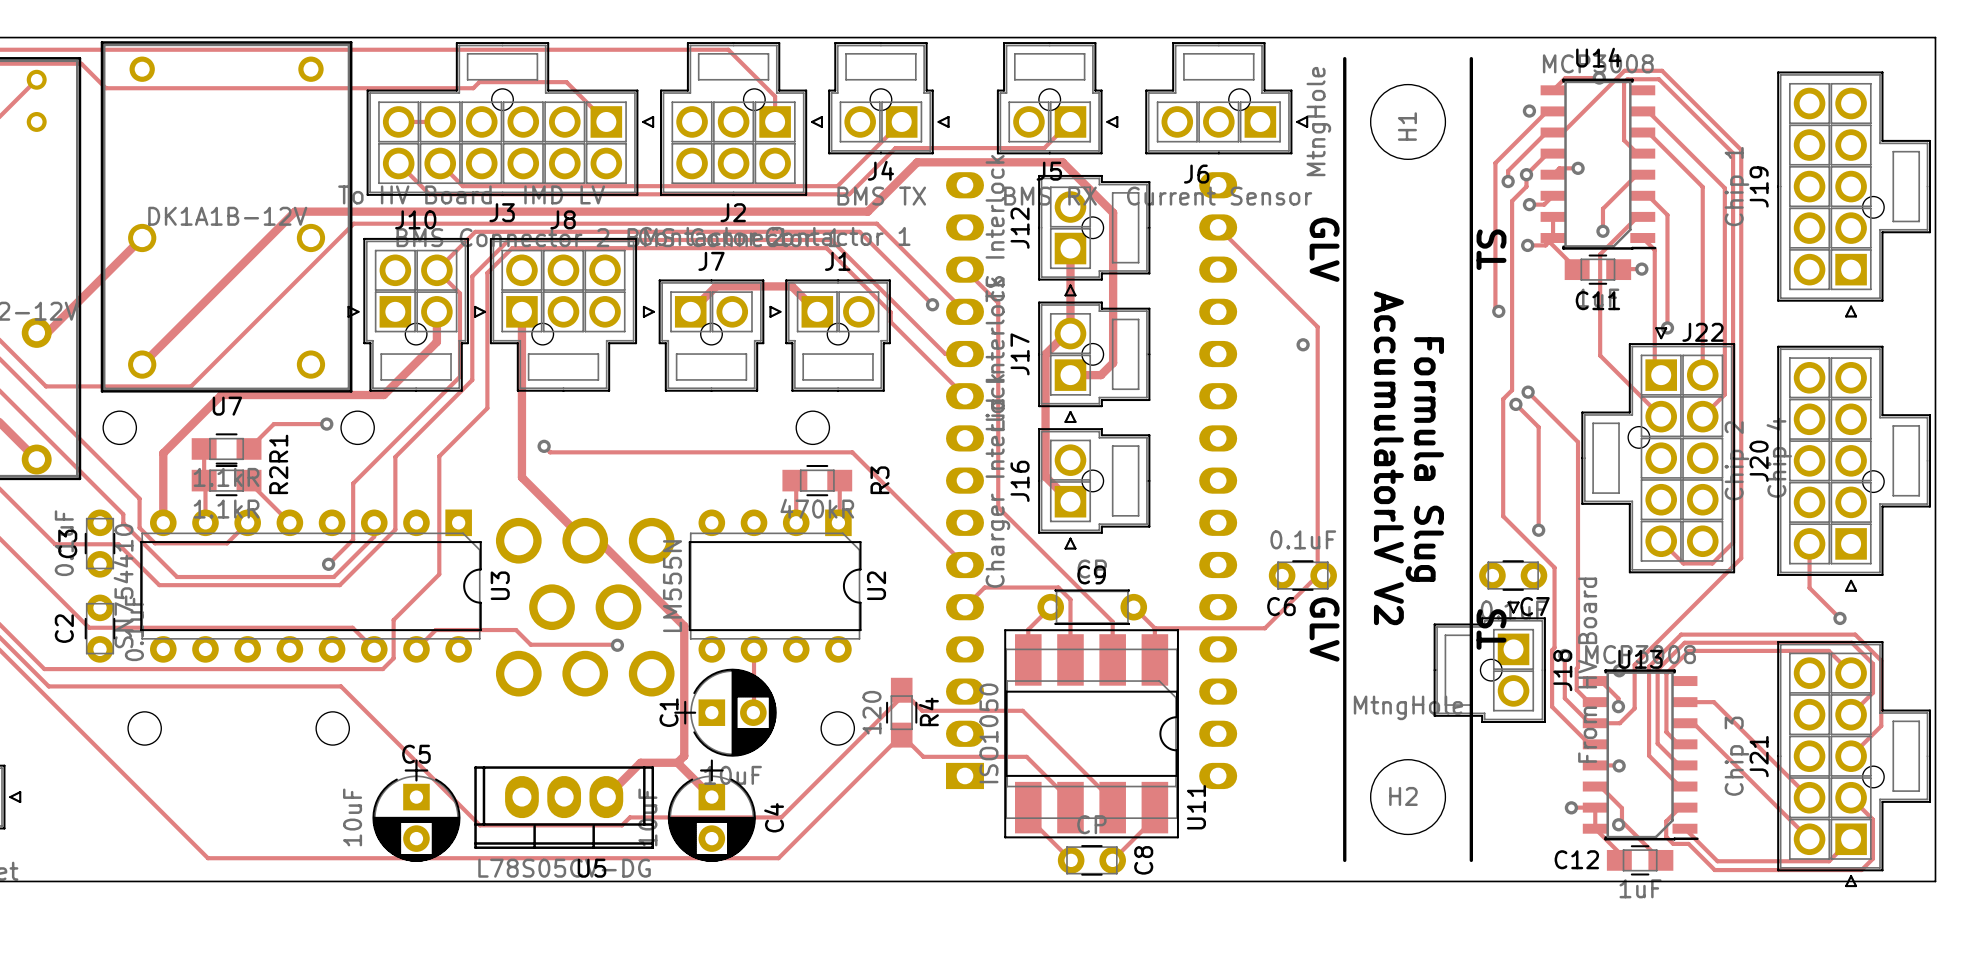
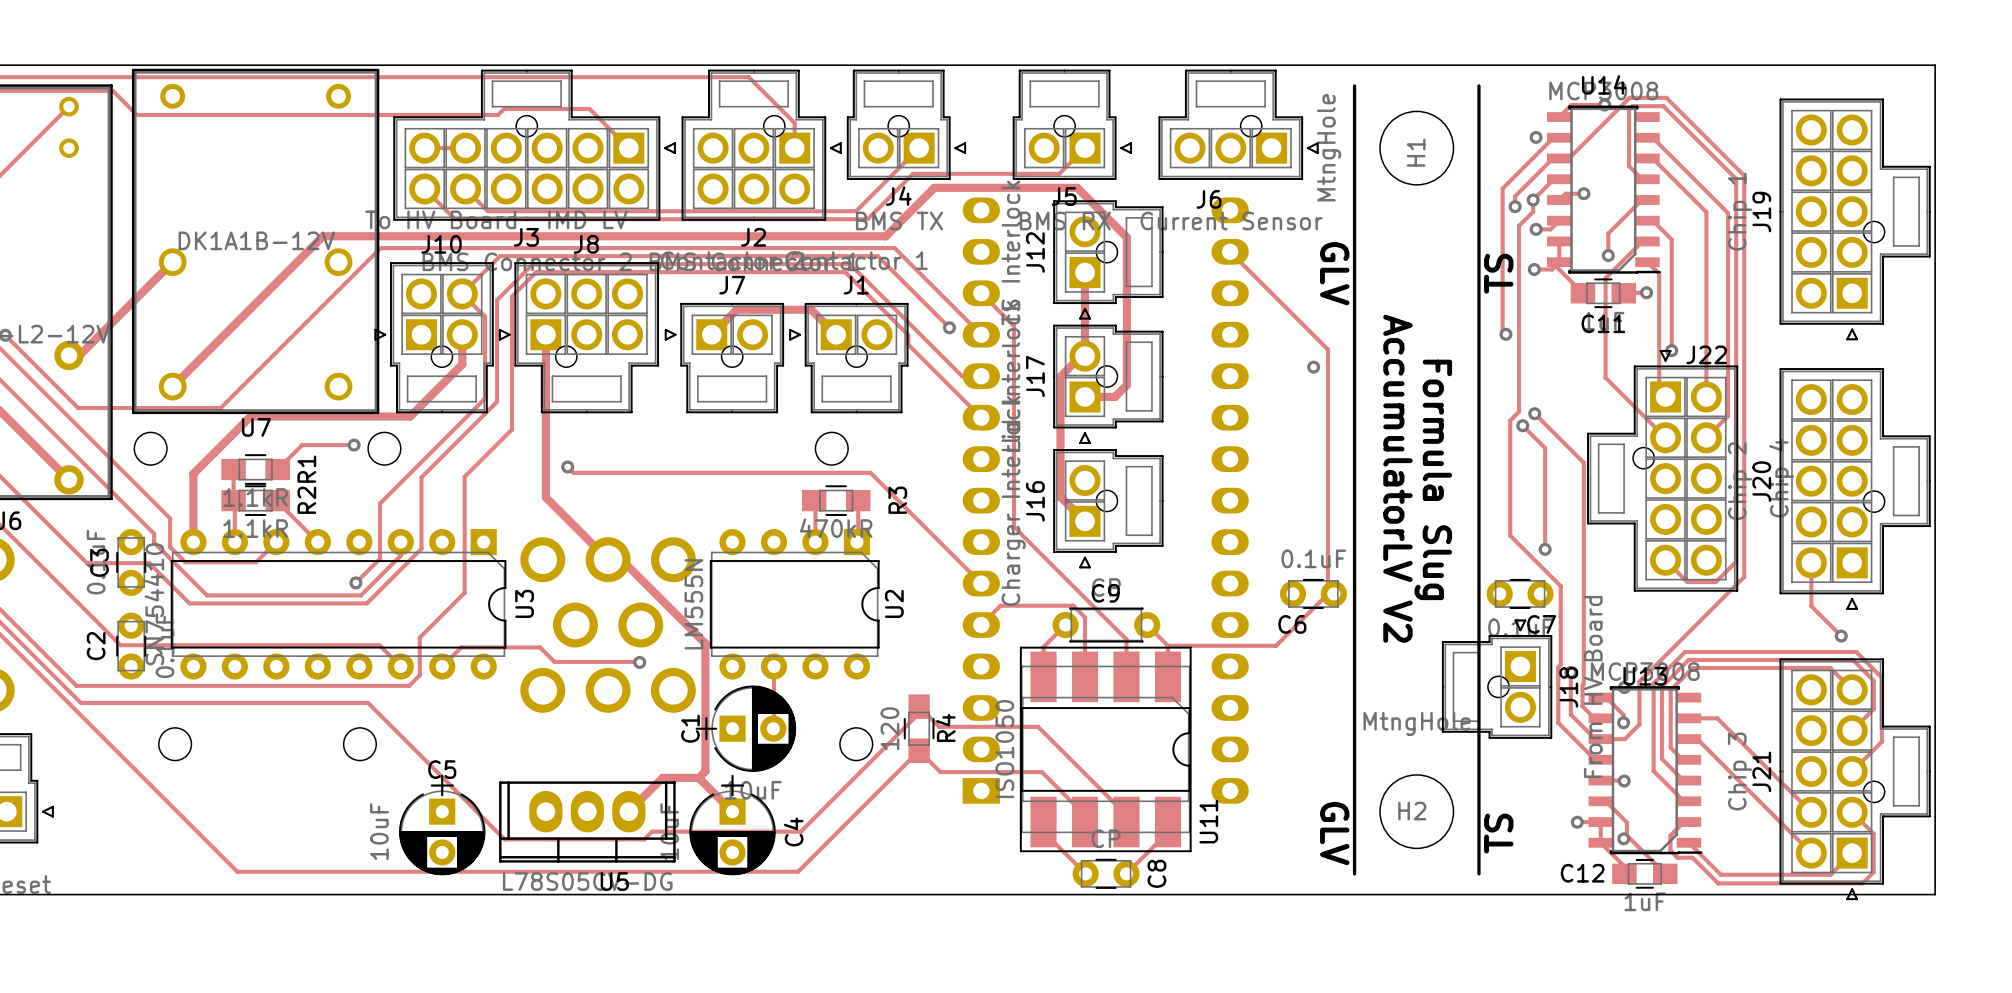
text position: GLV (1324, 629) -> GLV (1334, 833)
text position: TS (1491, 629) -> TS (1498, 833)

